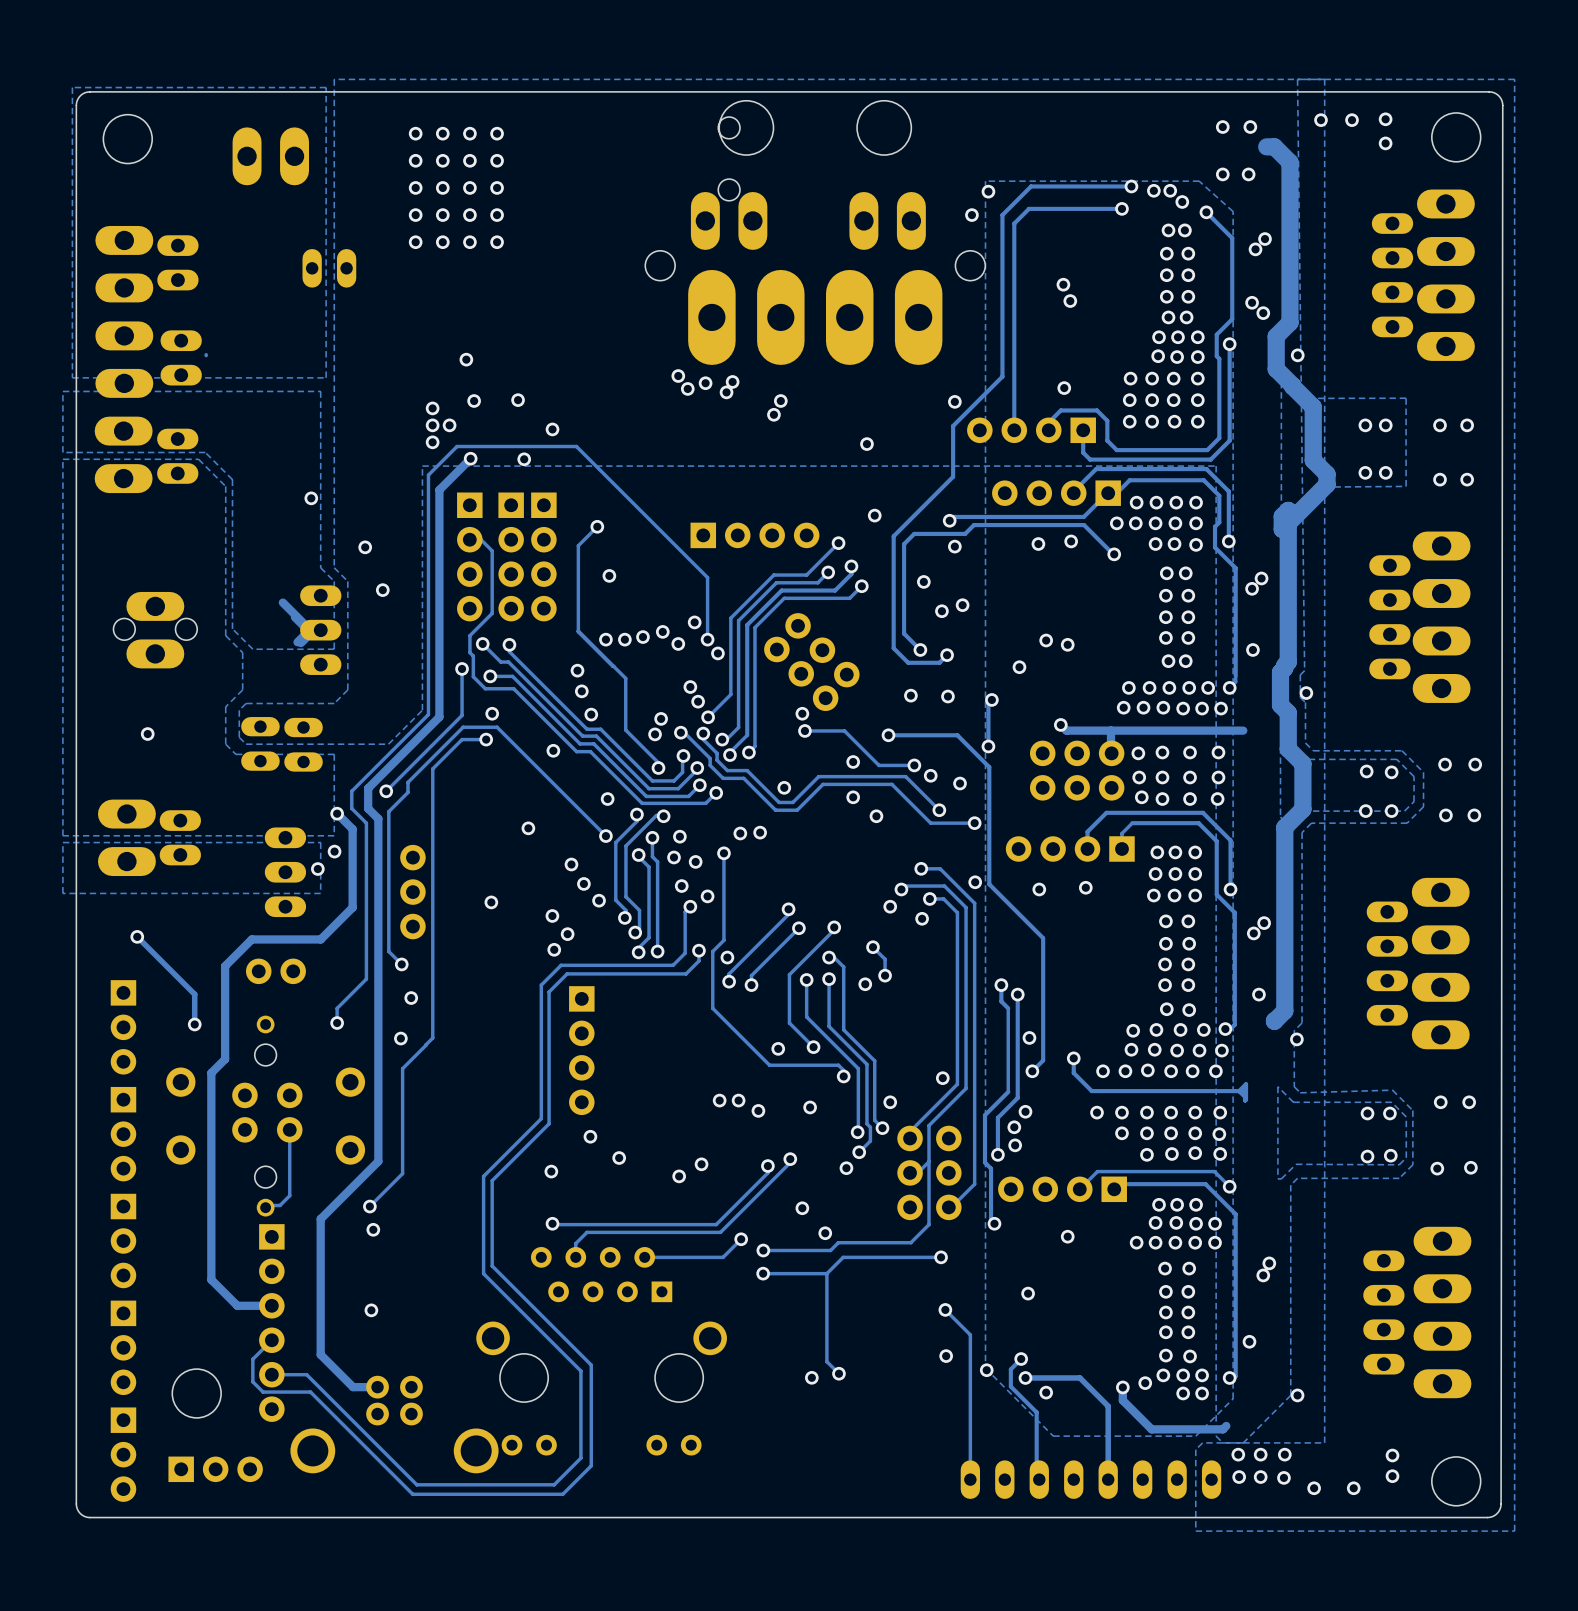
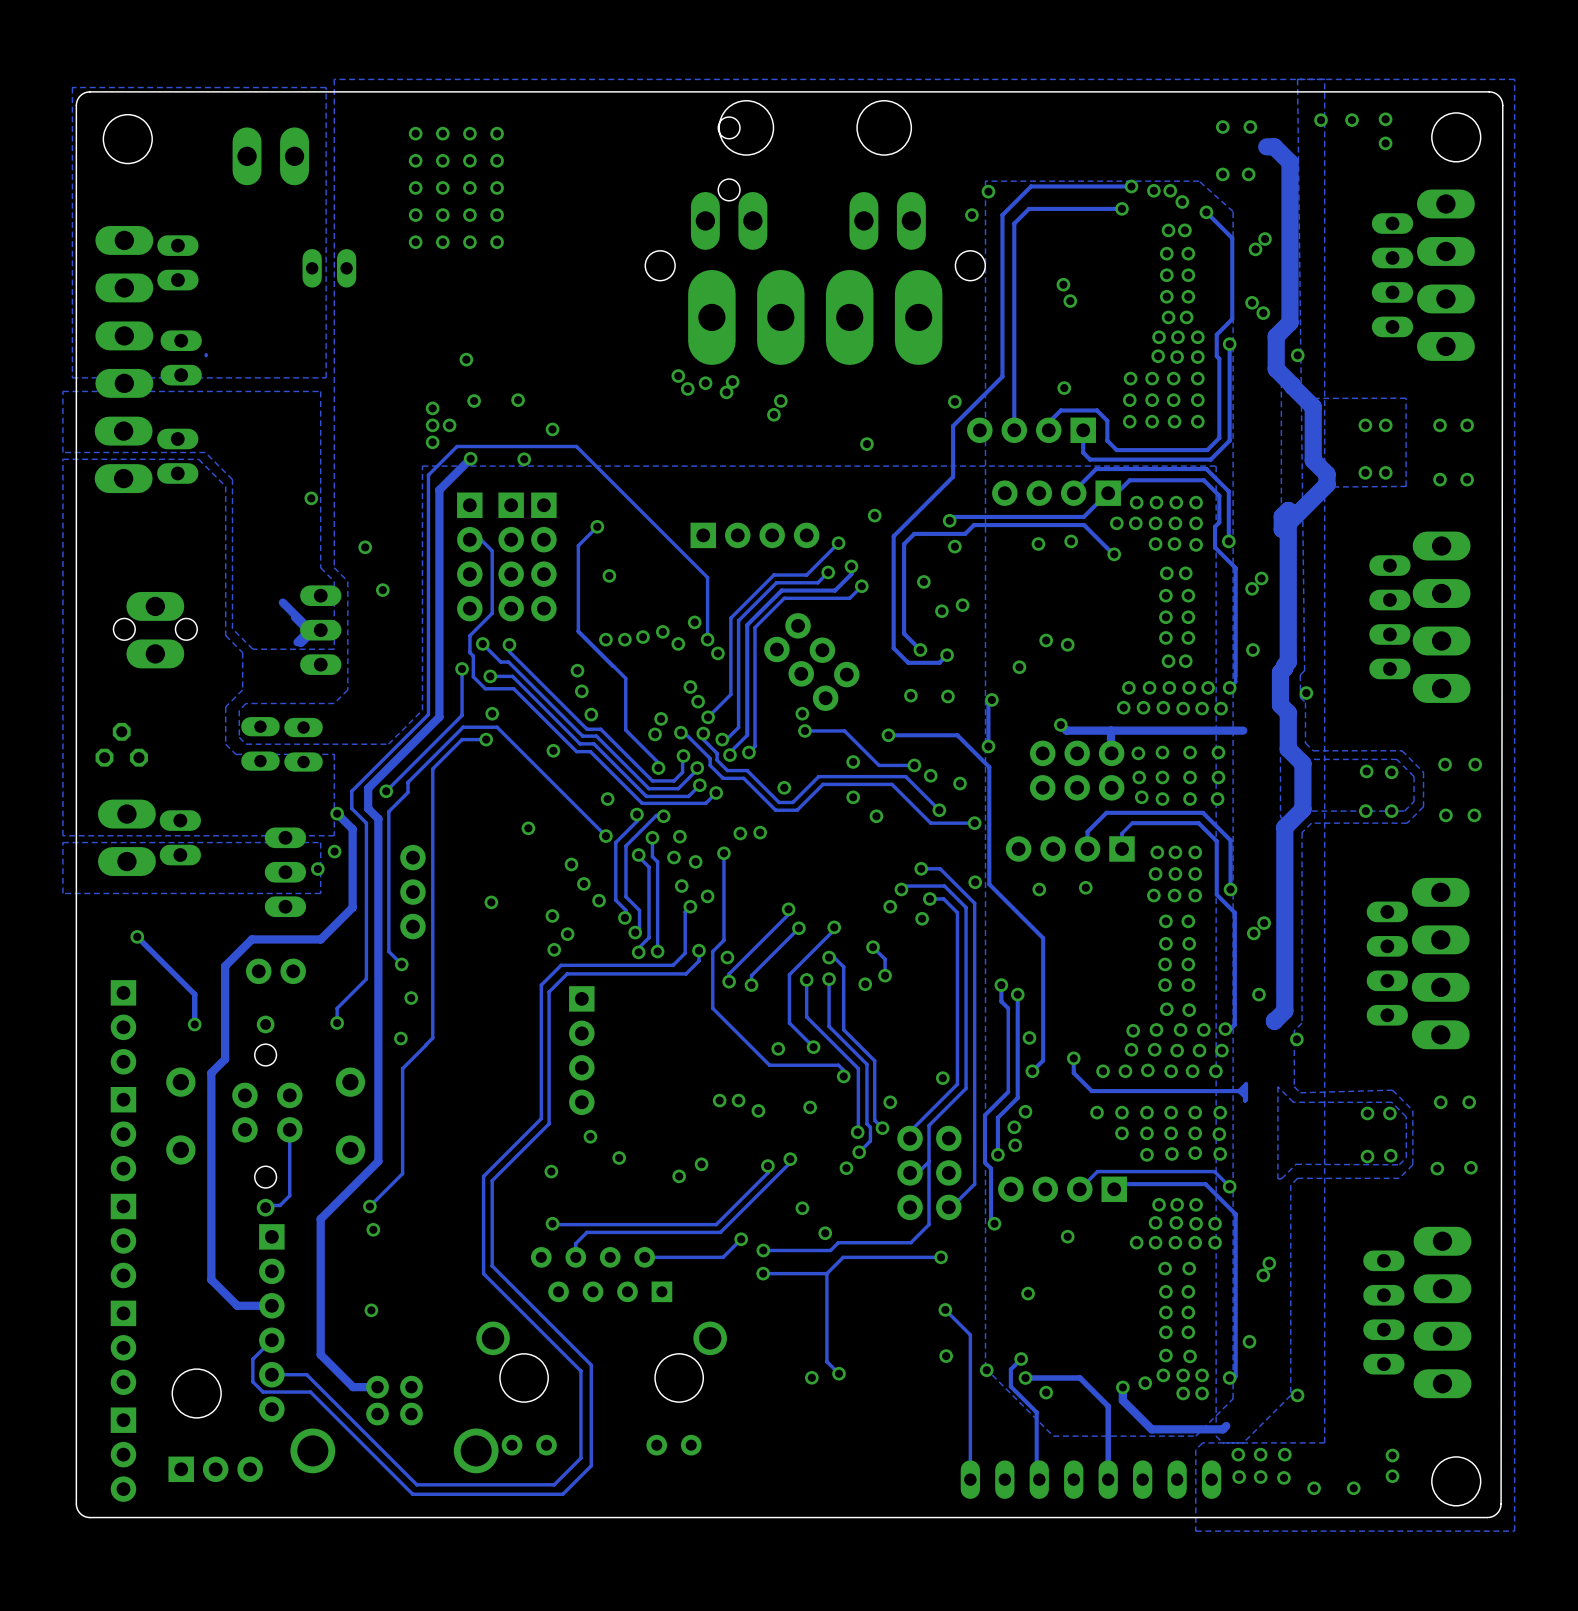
via: (147, 734) -> none
part: none -> (121, 744)

